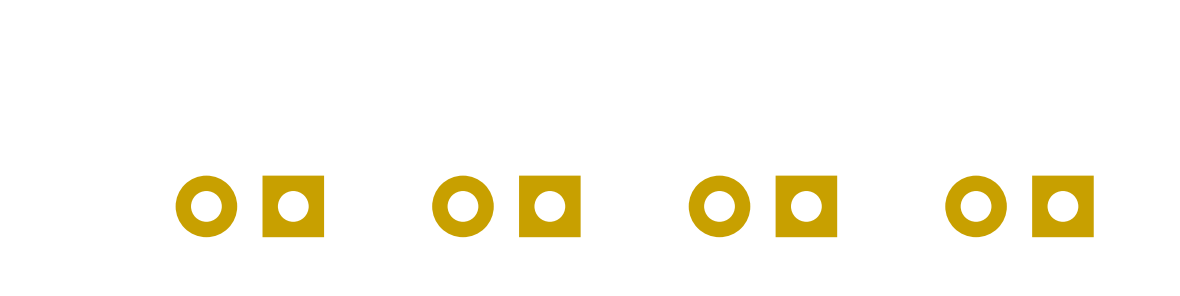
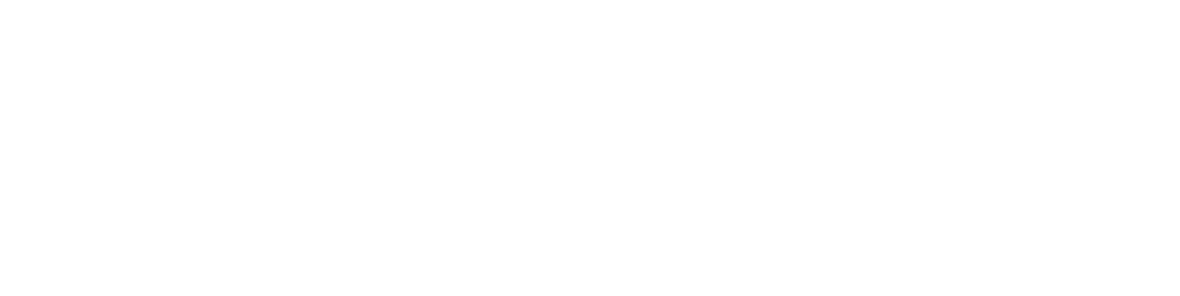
part: (249, 206) -> none
part: (506, 206) -> none
part: (762, 206) -> none
part: (1019, 206) -> none

